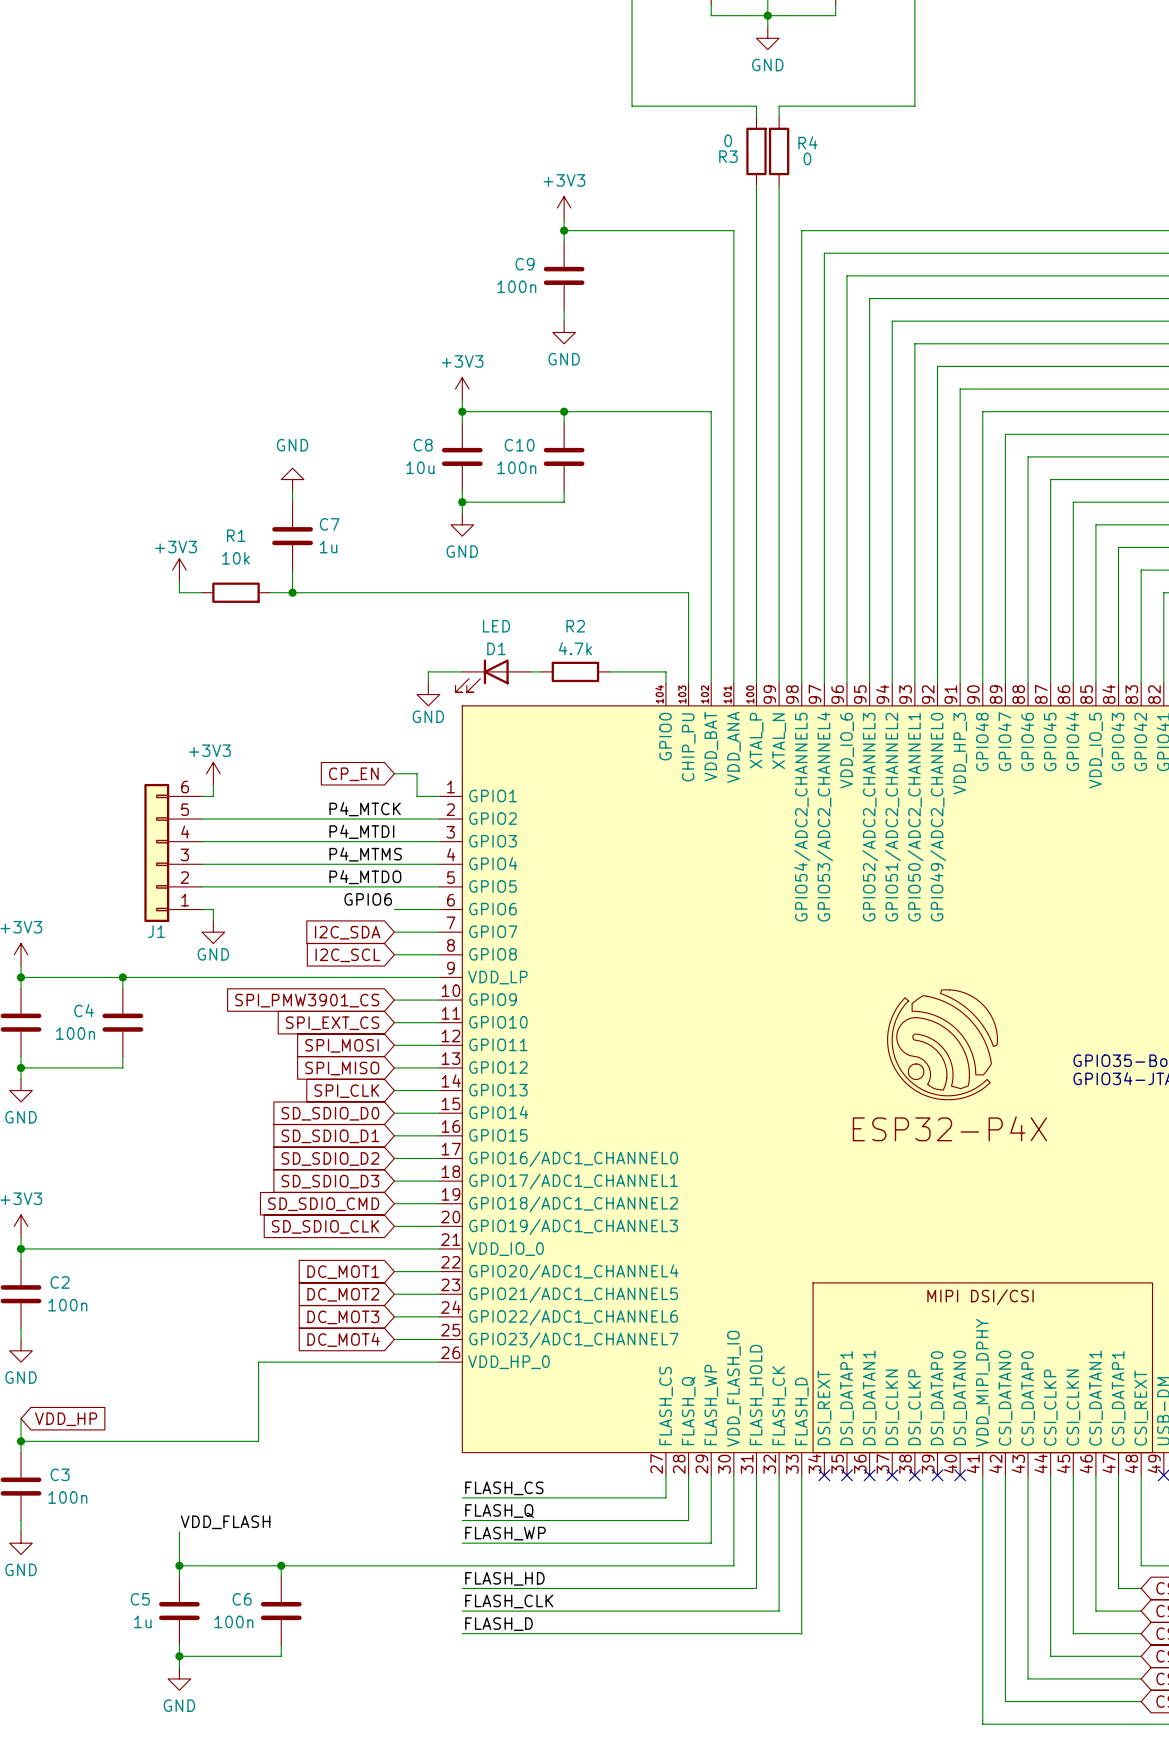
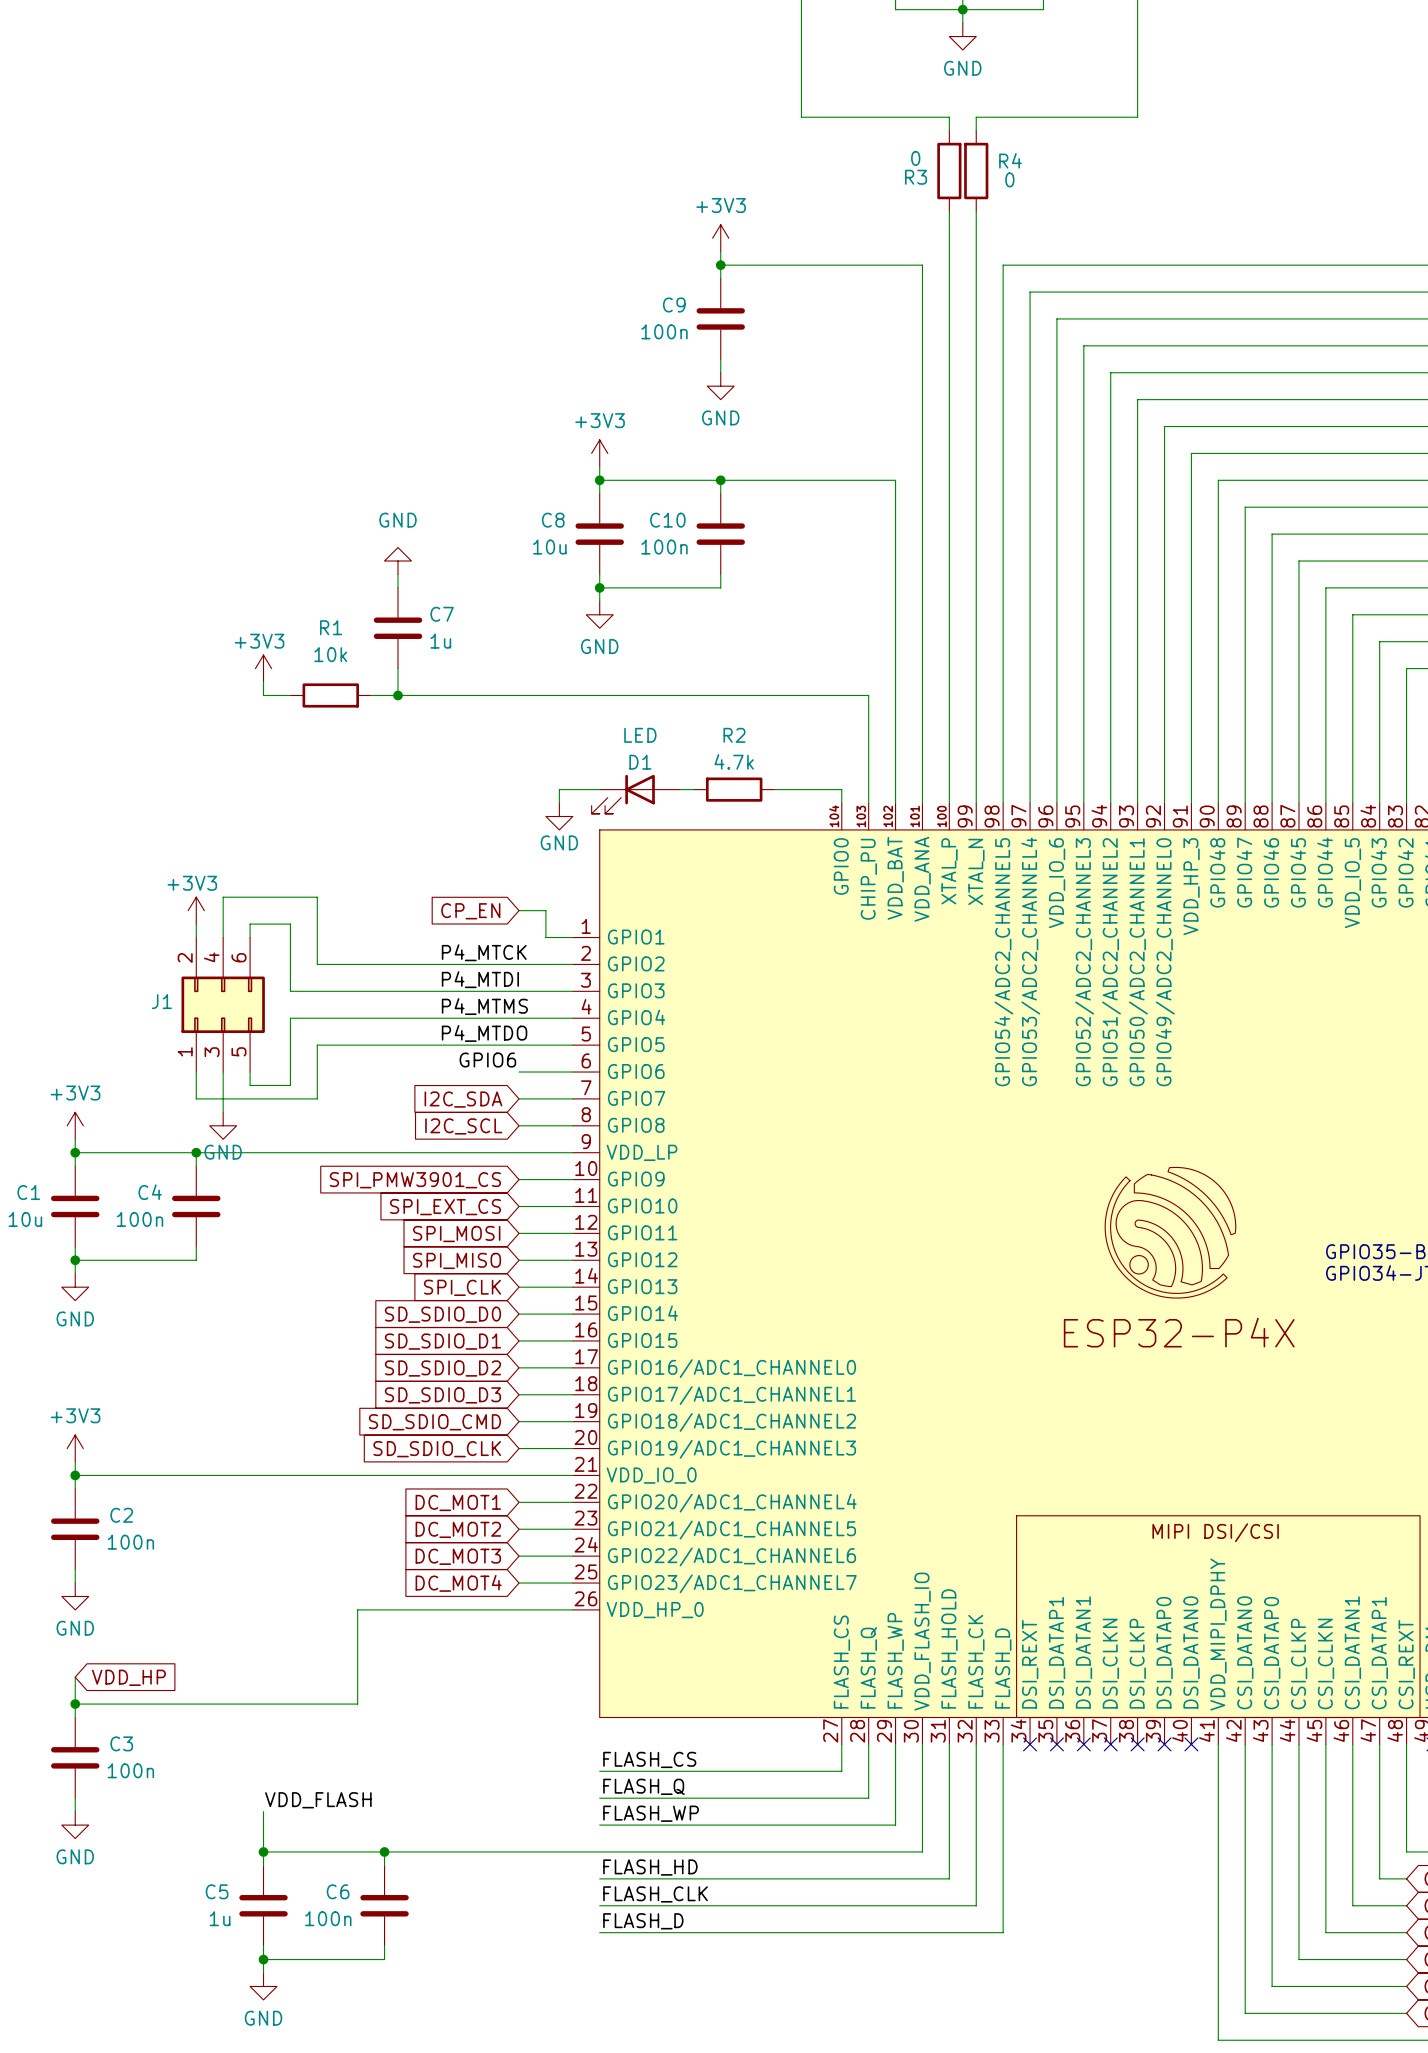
power symbol position: +3V3 (213, 773) -> +3V3 (196, 910)
J1 symbol: [144, 783, 203, 922] -> [181, 937, 265, 1073]
wire: none -> (196, 924) (196, 937)
wire: (213, 785) (213, 796) (202, 796) -> none
wire: none -> (250, 937) (250, 924) (290, 924) (290, 991)
wire: (202, 819) (224, 819) -> (223, 937) (223, 897) (317, 897) (317, 964)
wire: none -> (290, 1018) (290, 1085) (250, 1085) (250, 1072)
wire: (202, 886) (224, 886) -> (196, 1072) (196, 1098) (317, 1098) (317, 1045)
wire: none -> (223, 1072) (223, 1112)
wire: (202, 909) (213, 909) (213, 920) -> none
J1 name position: J1 (156, 931) -> J1 (161, 1001)
power symbol position: GND (213, 932) -> GND (223, 1125)

